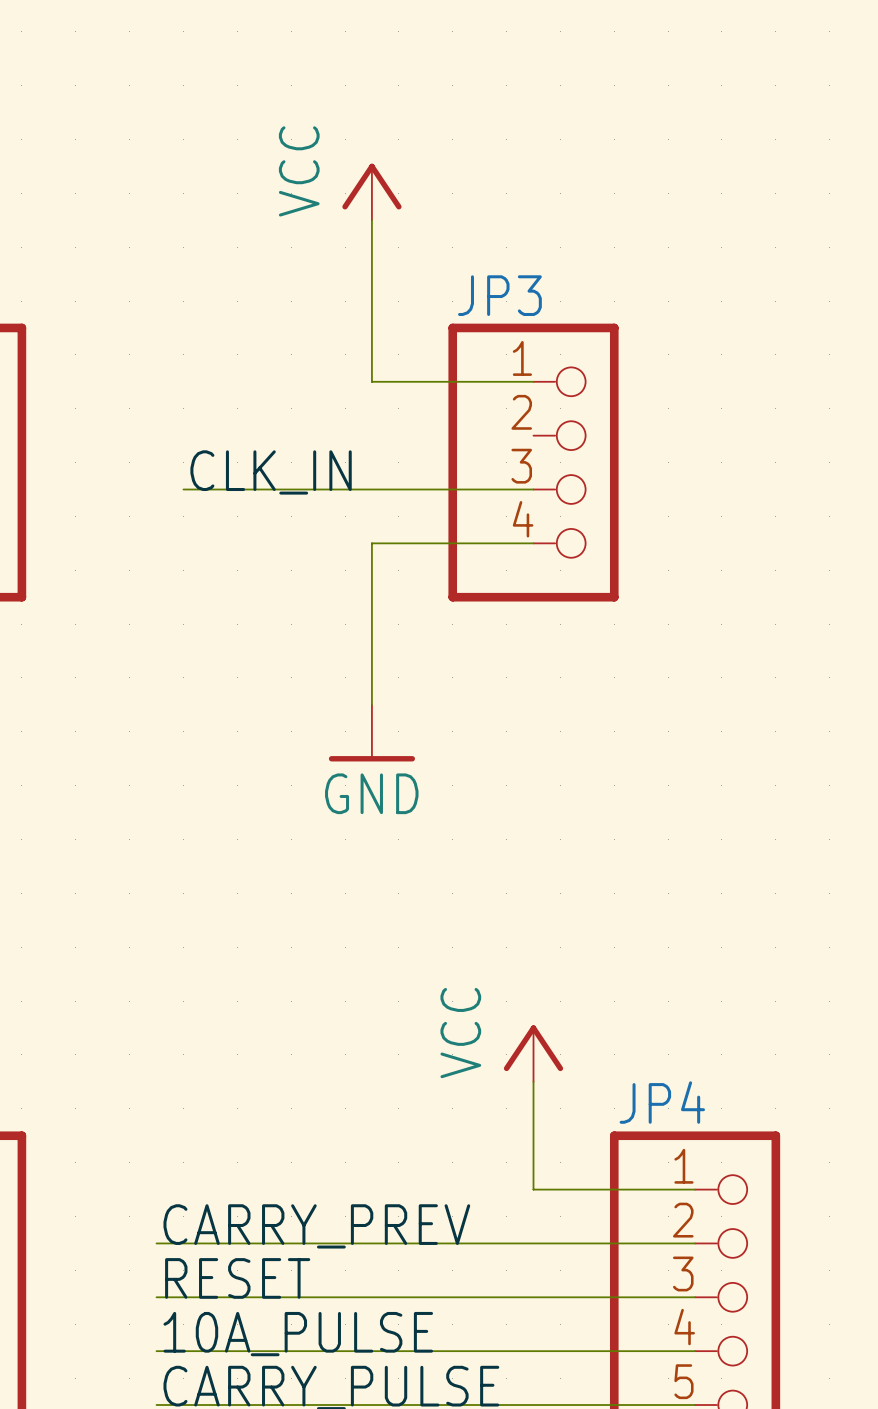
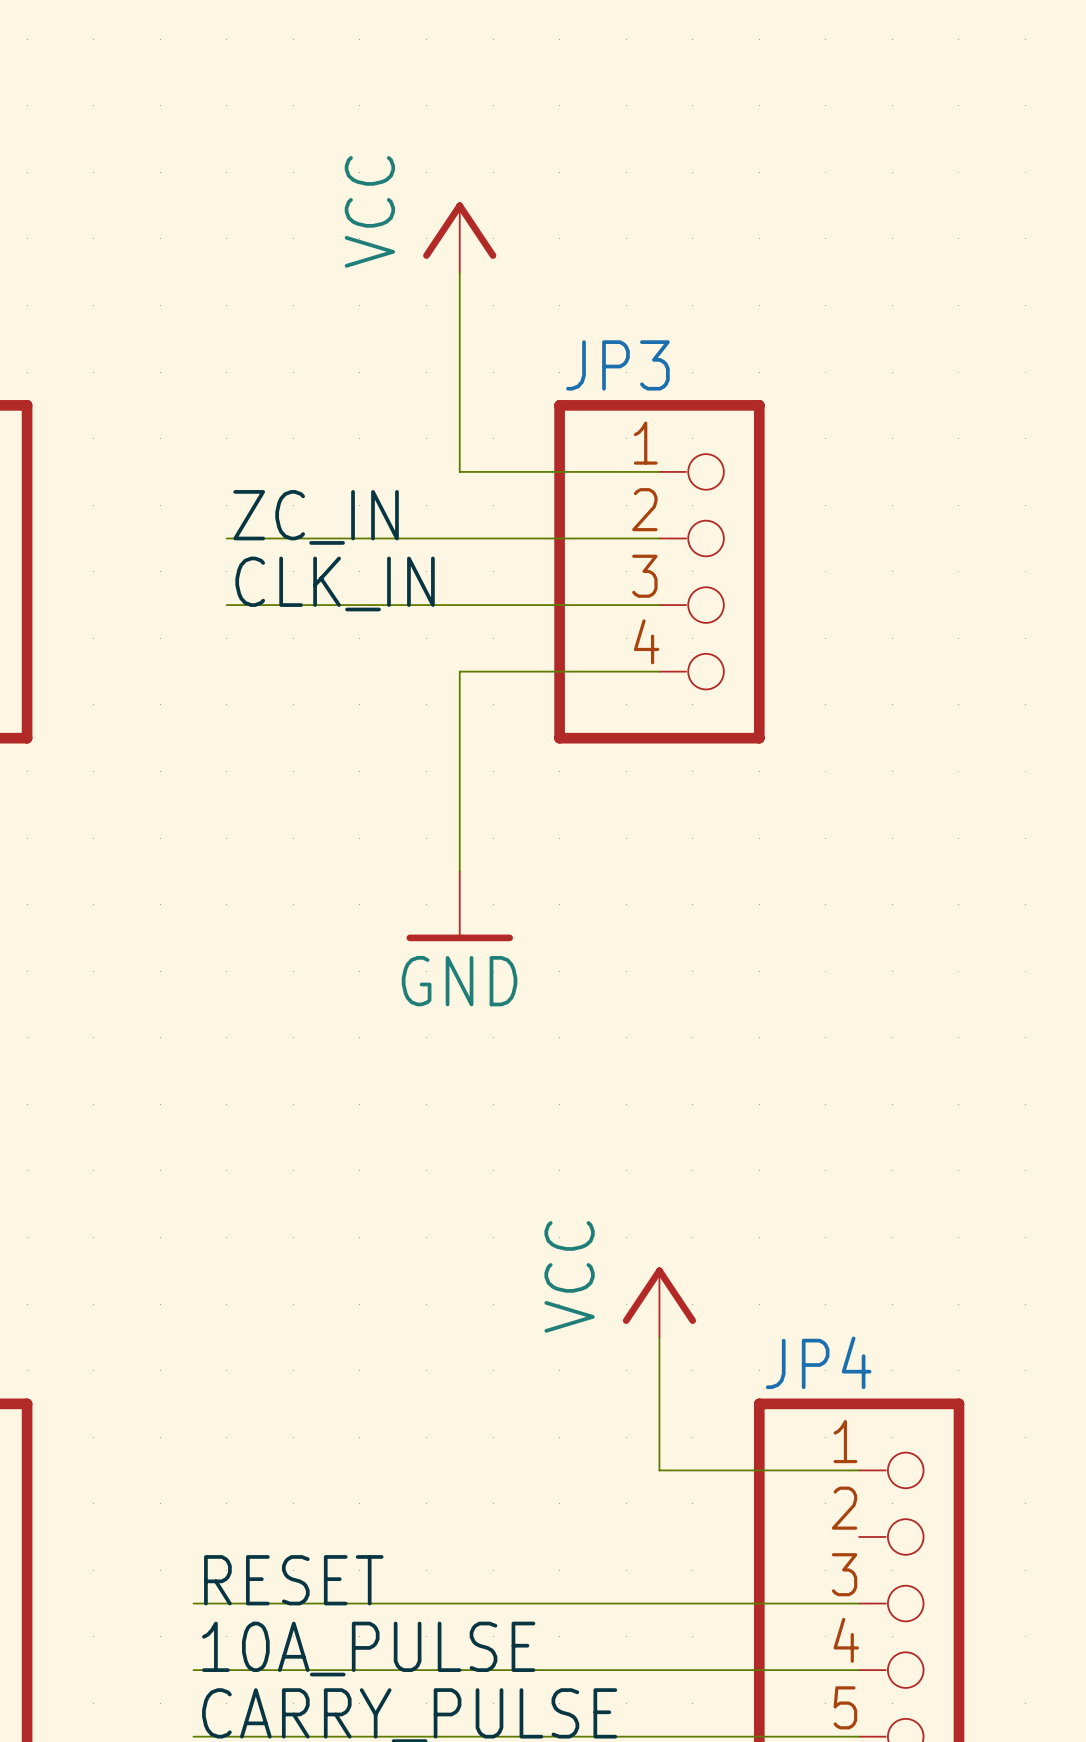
label: none -> ZC_IN (316, 517)
wire: none -> (226, 538) (659, 538)
label: CARRY_PREV (316, 1226) -> none
wire: (156, 1243) (695, 1243) -> none

